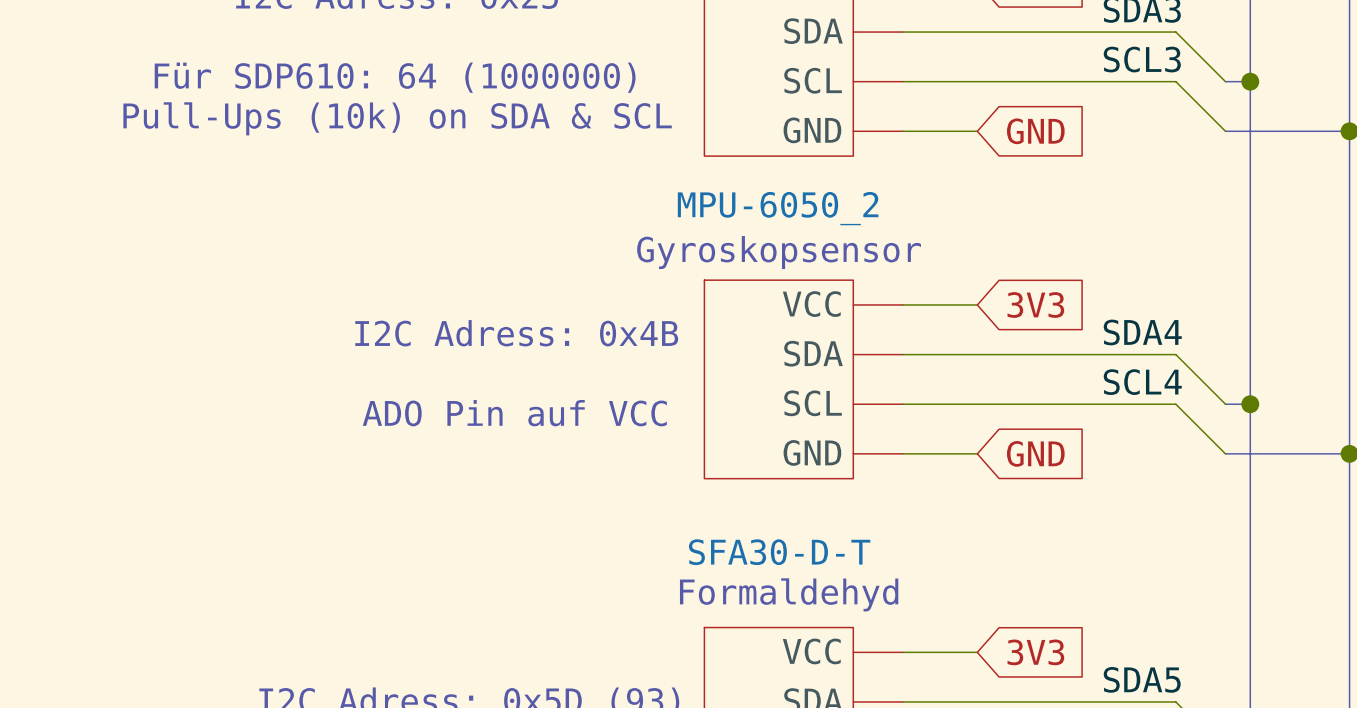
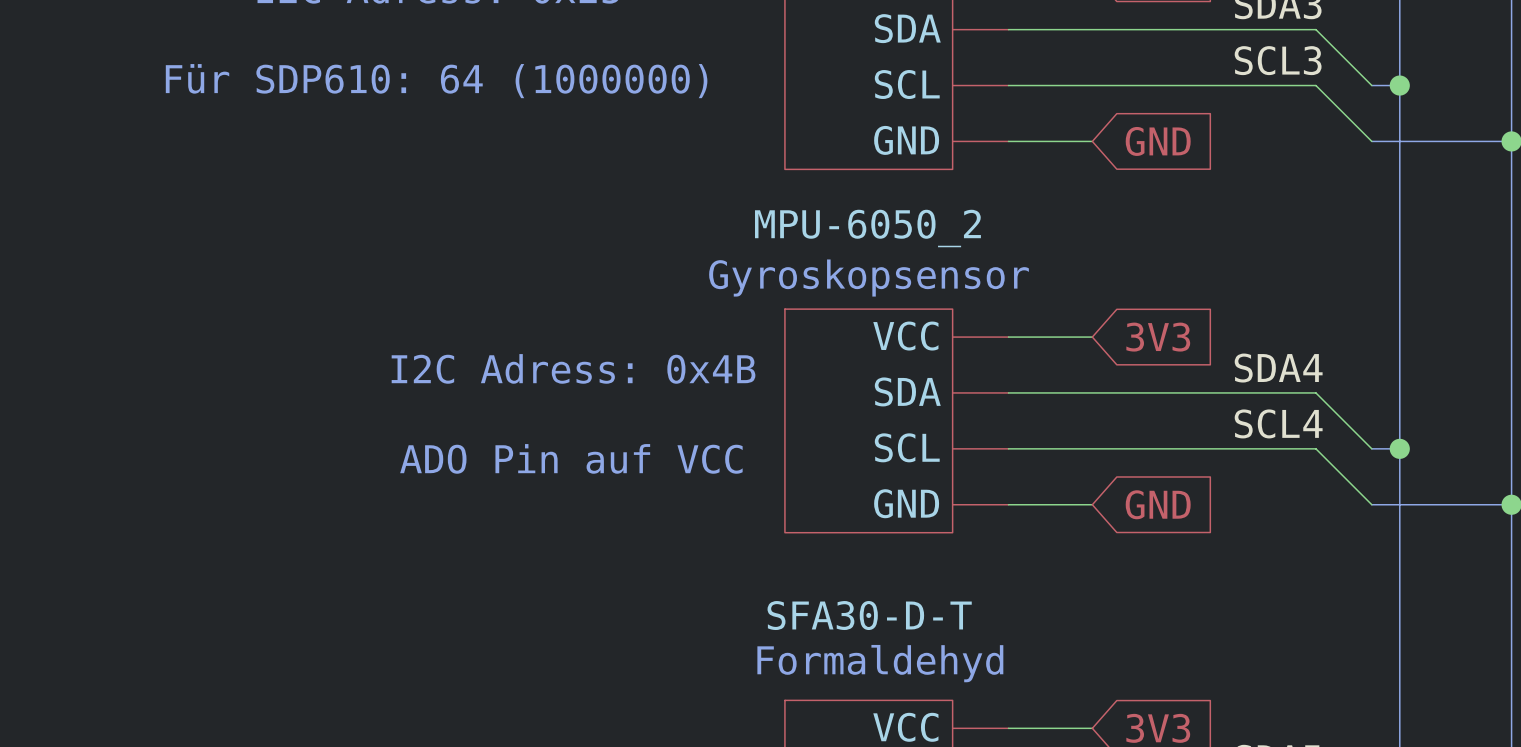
text: Pull-Ups (10k) on SDA & SCL (397, 118) -> none

